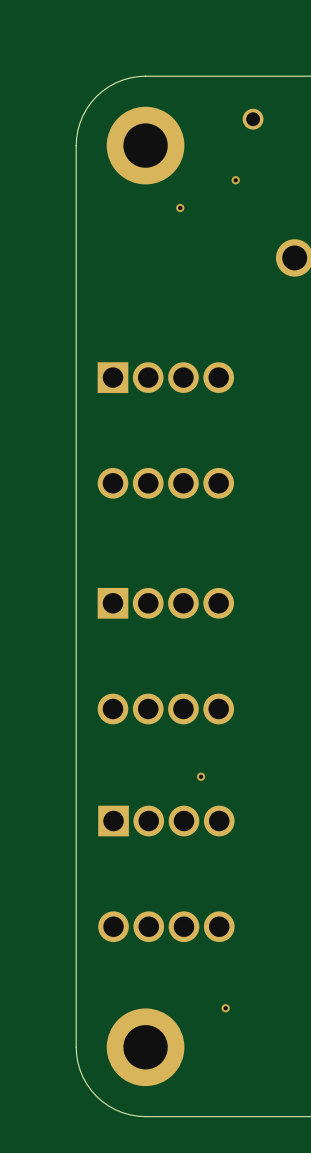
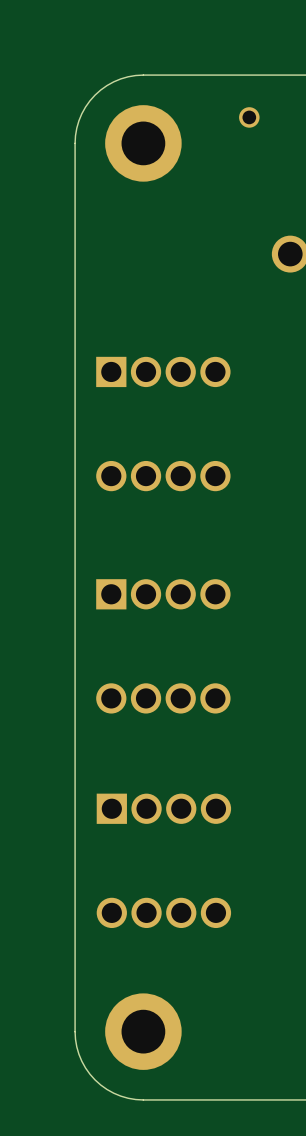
via: (235, 180) -> none
via: (180, 208) -> none
via: (201, 776) -> none
via: (225, 1008) -> none

